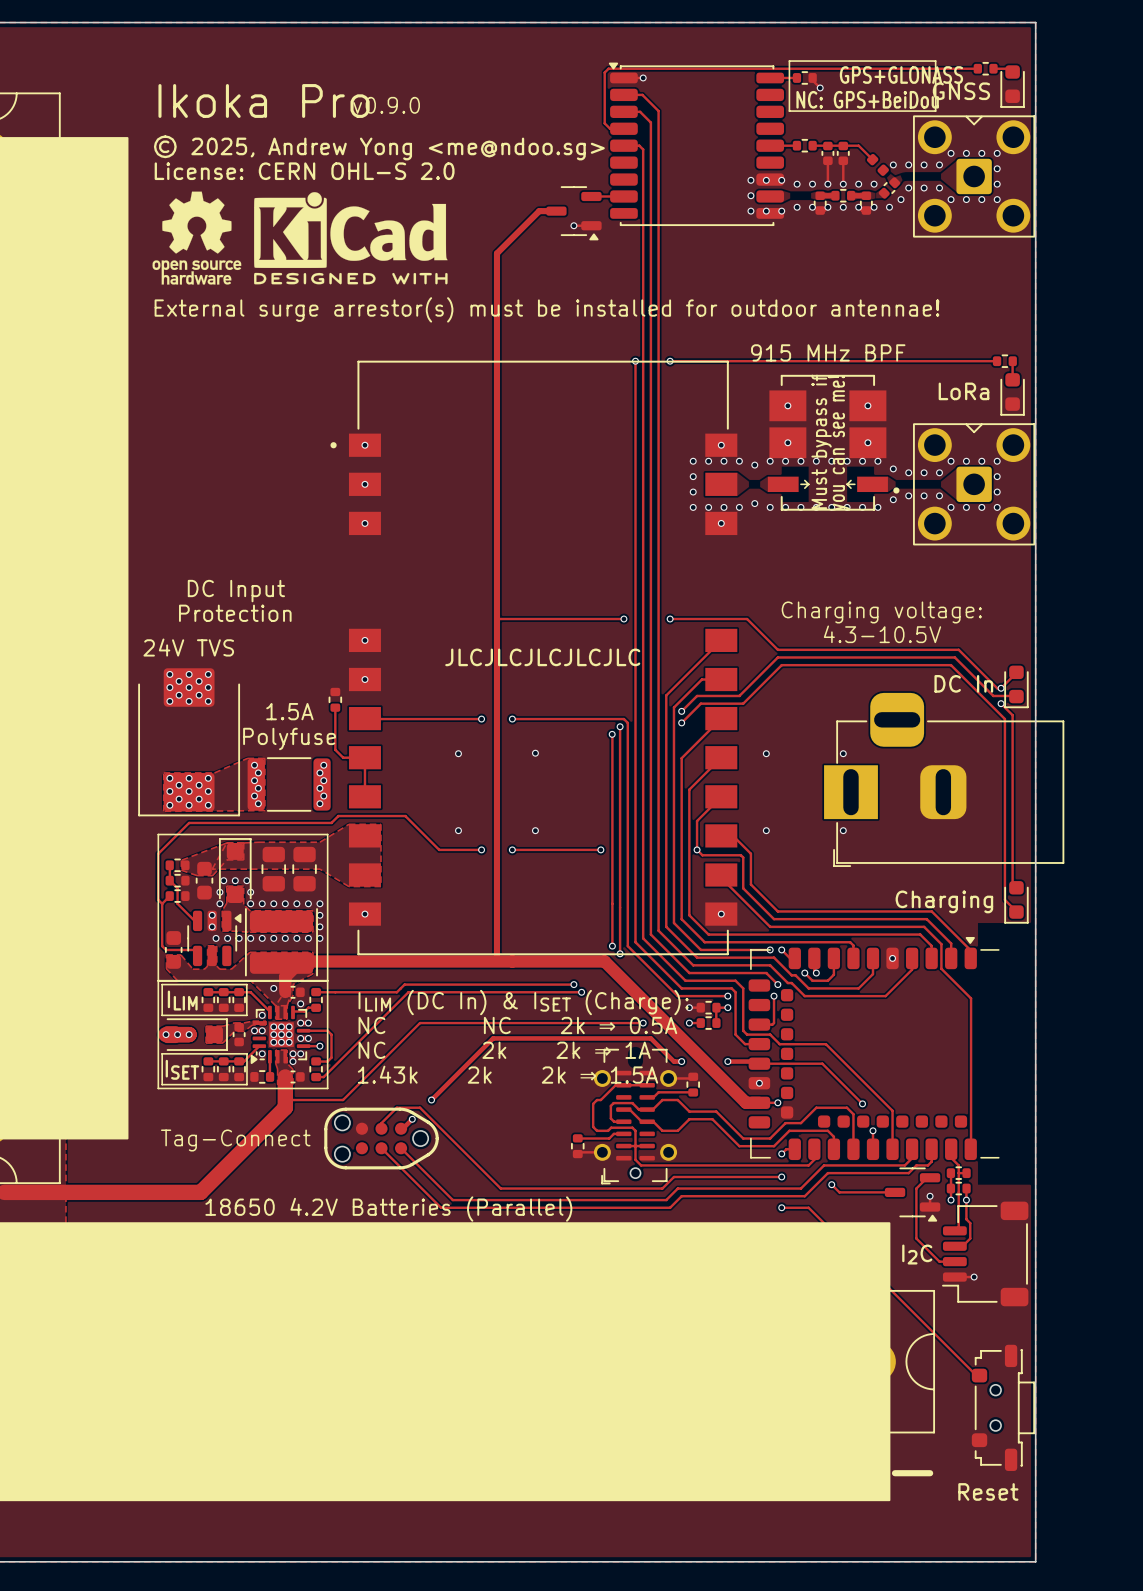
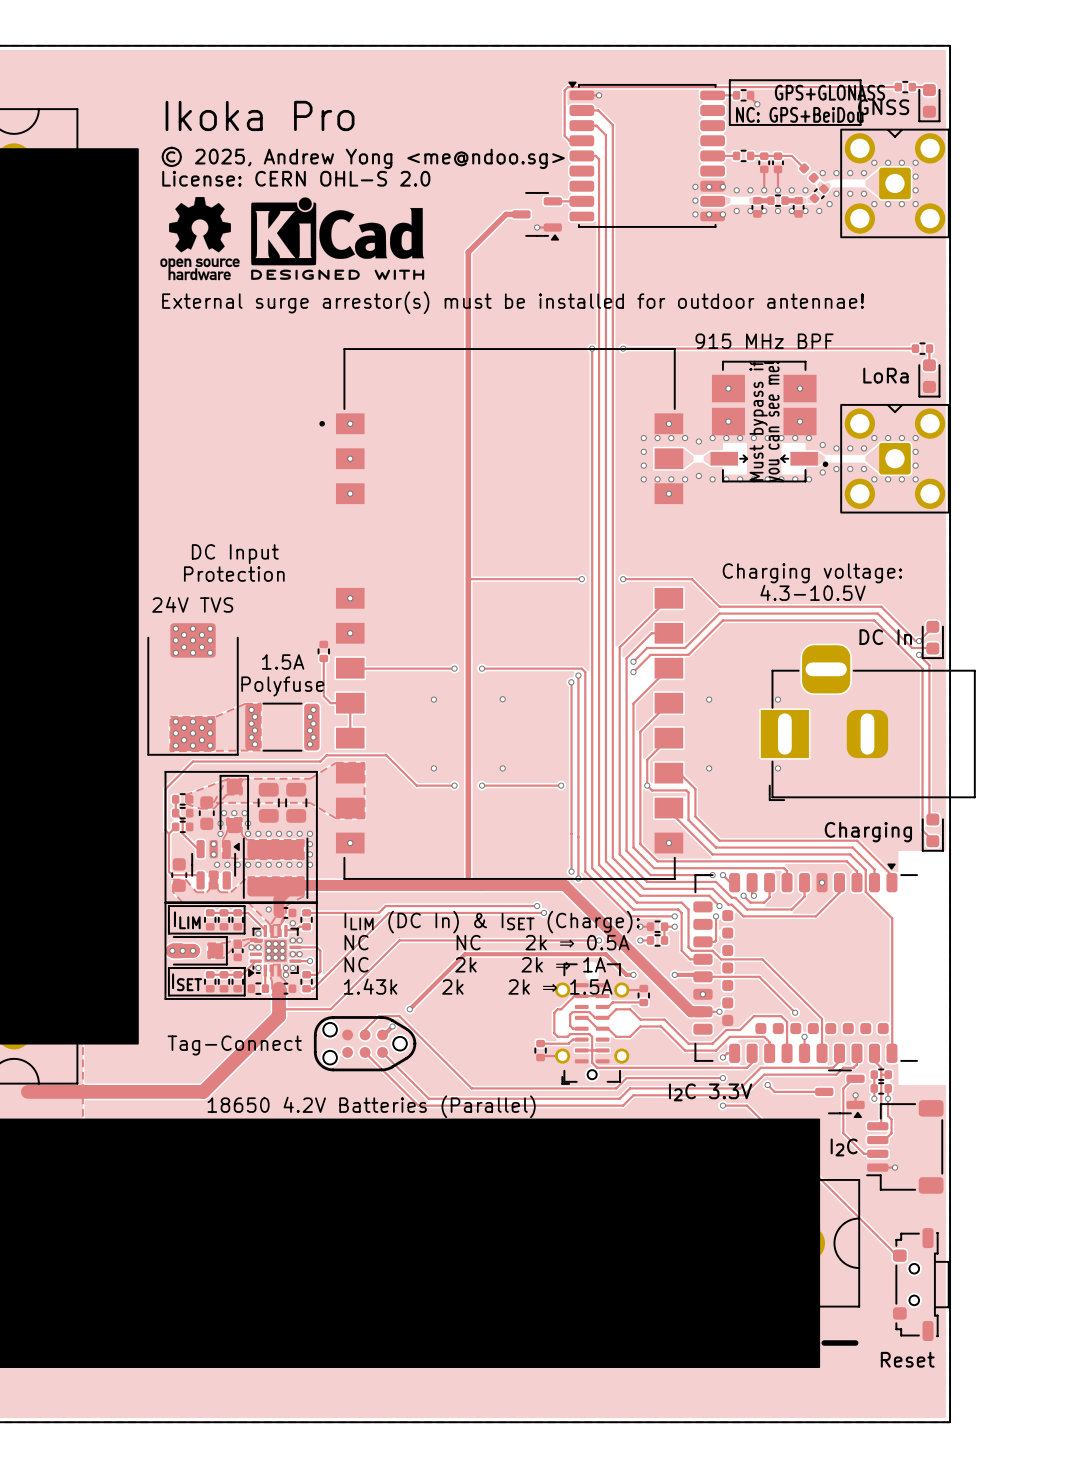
text: v0.9.0 (386, 105) -> none
text: JLCJLCJLCJLCJLC (542, 657) -> none
text: none -> I2C 3.3V (710, 1092)

